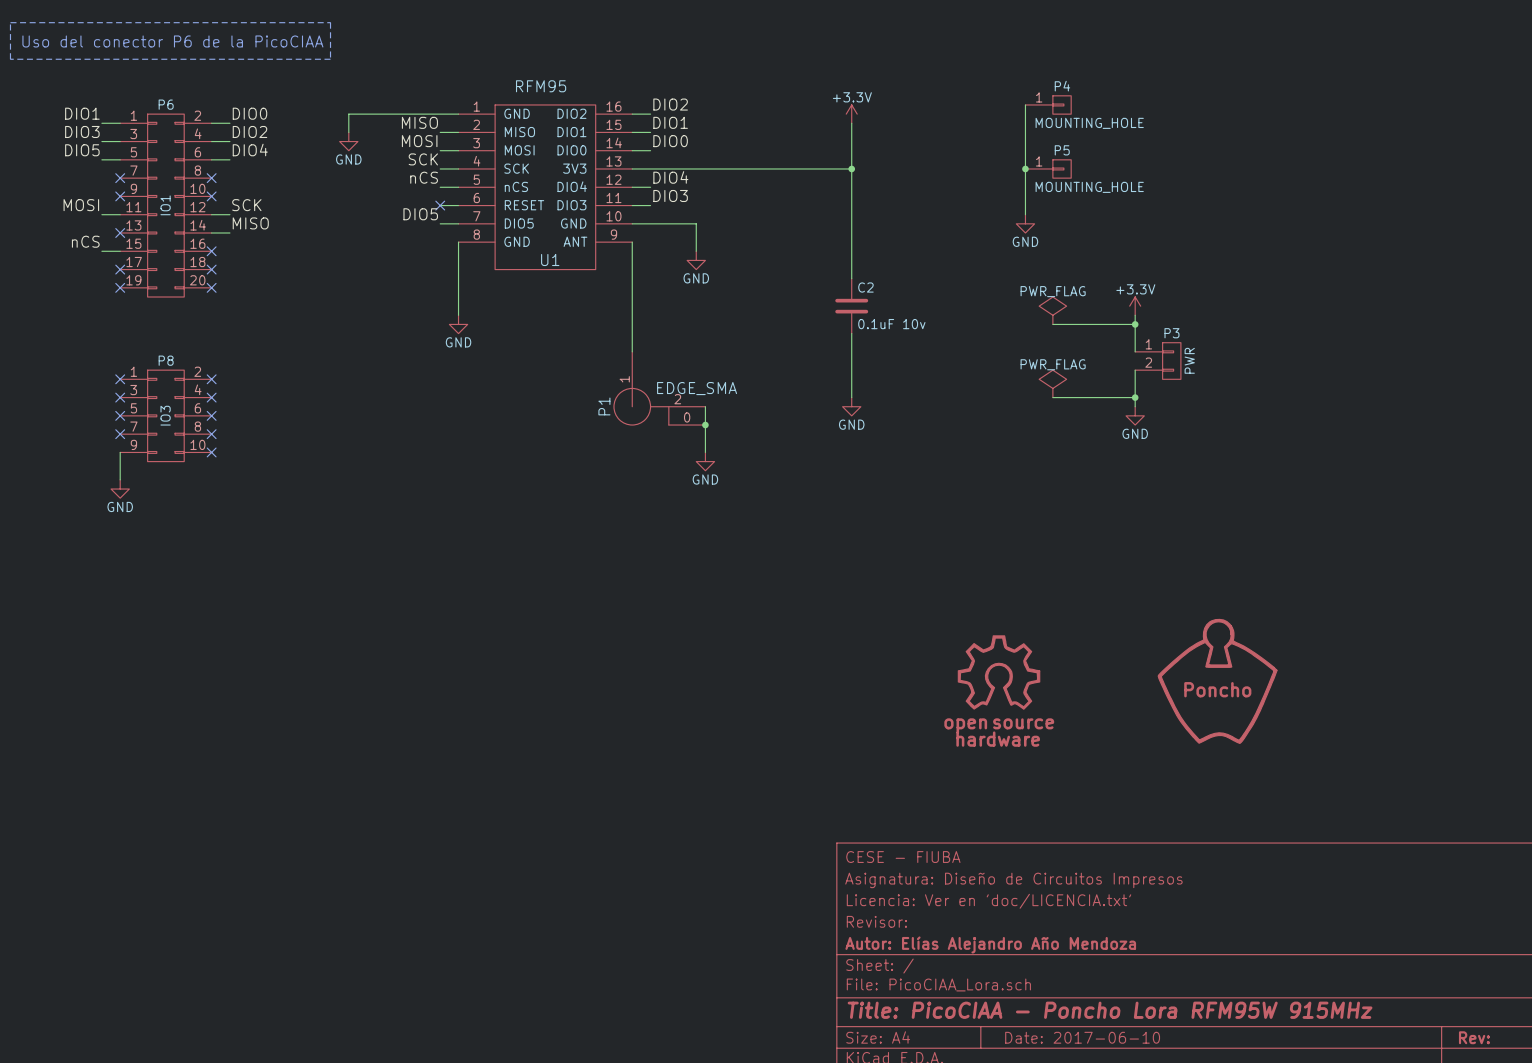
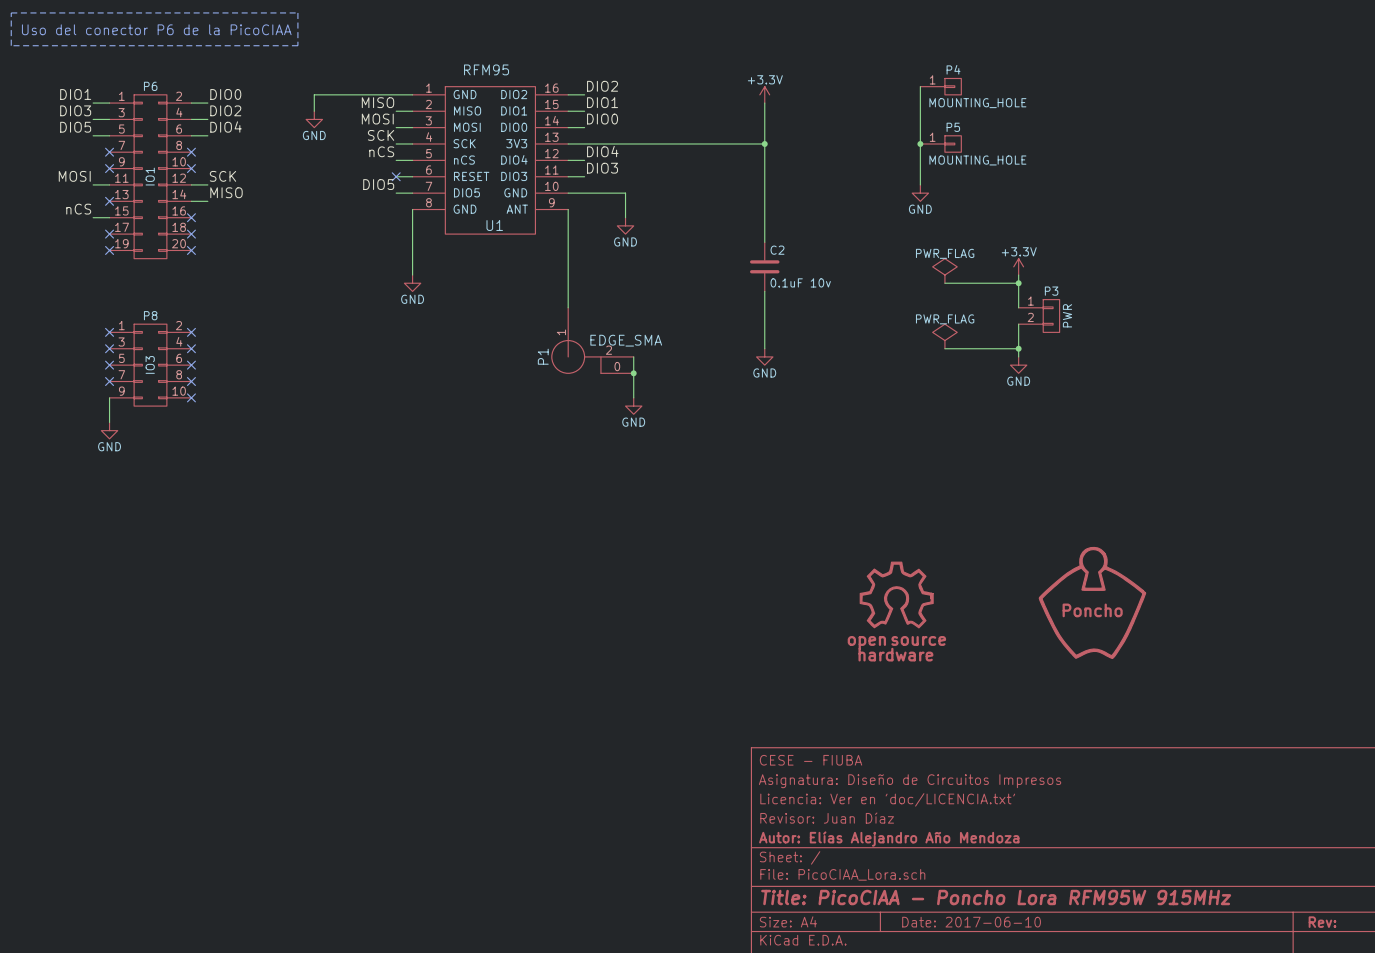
title block: Revisor: (876, 921) -> Revisor: Juan Díaz (827, 818)

